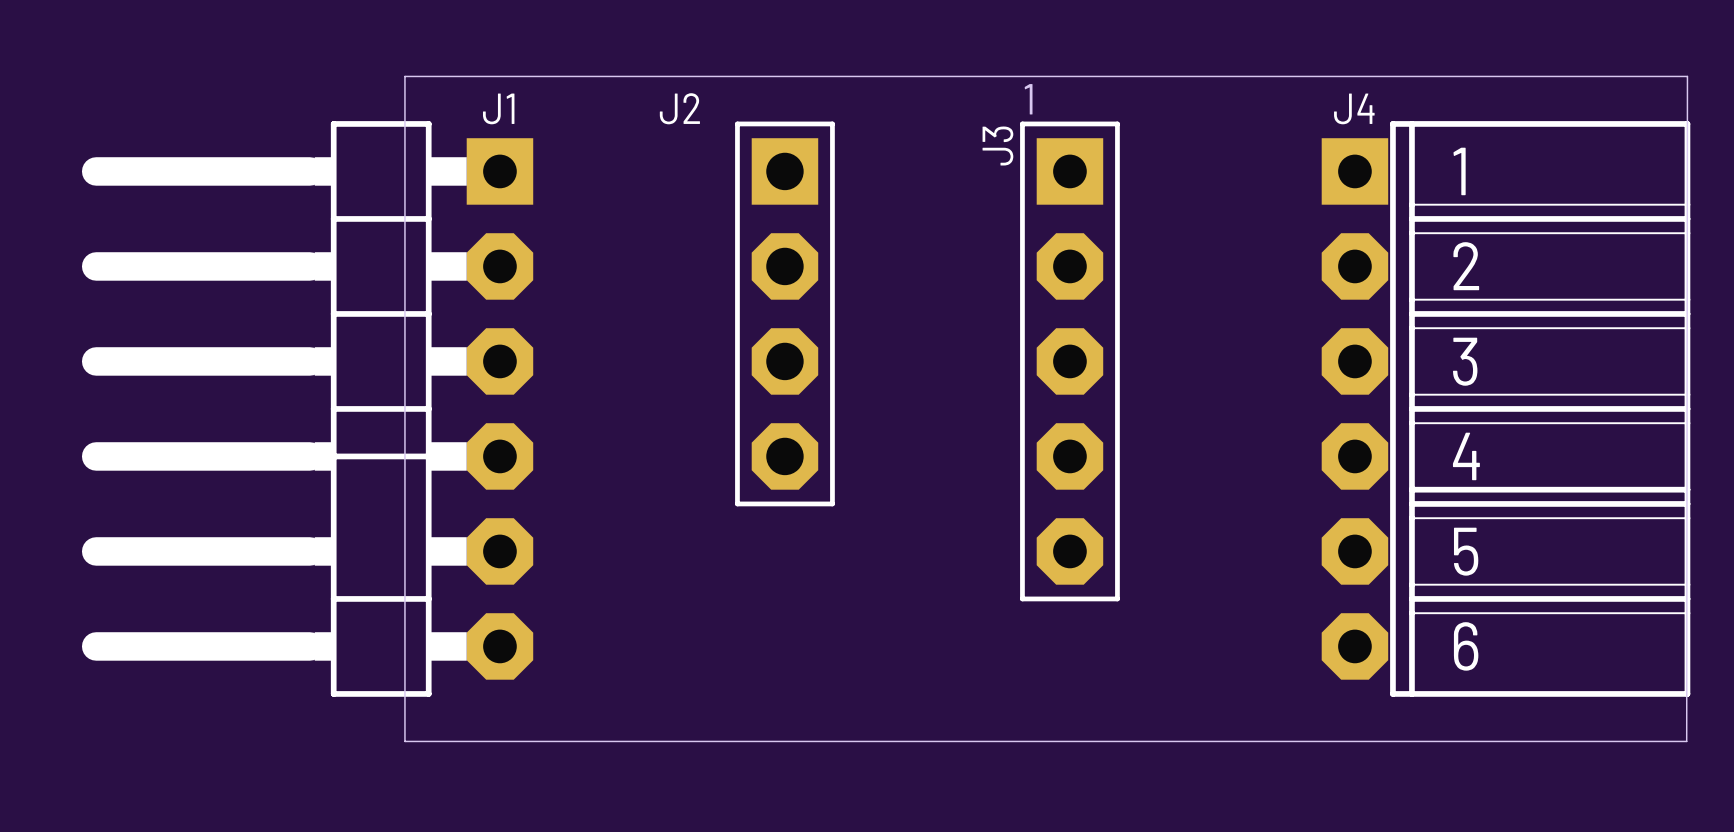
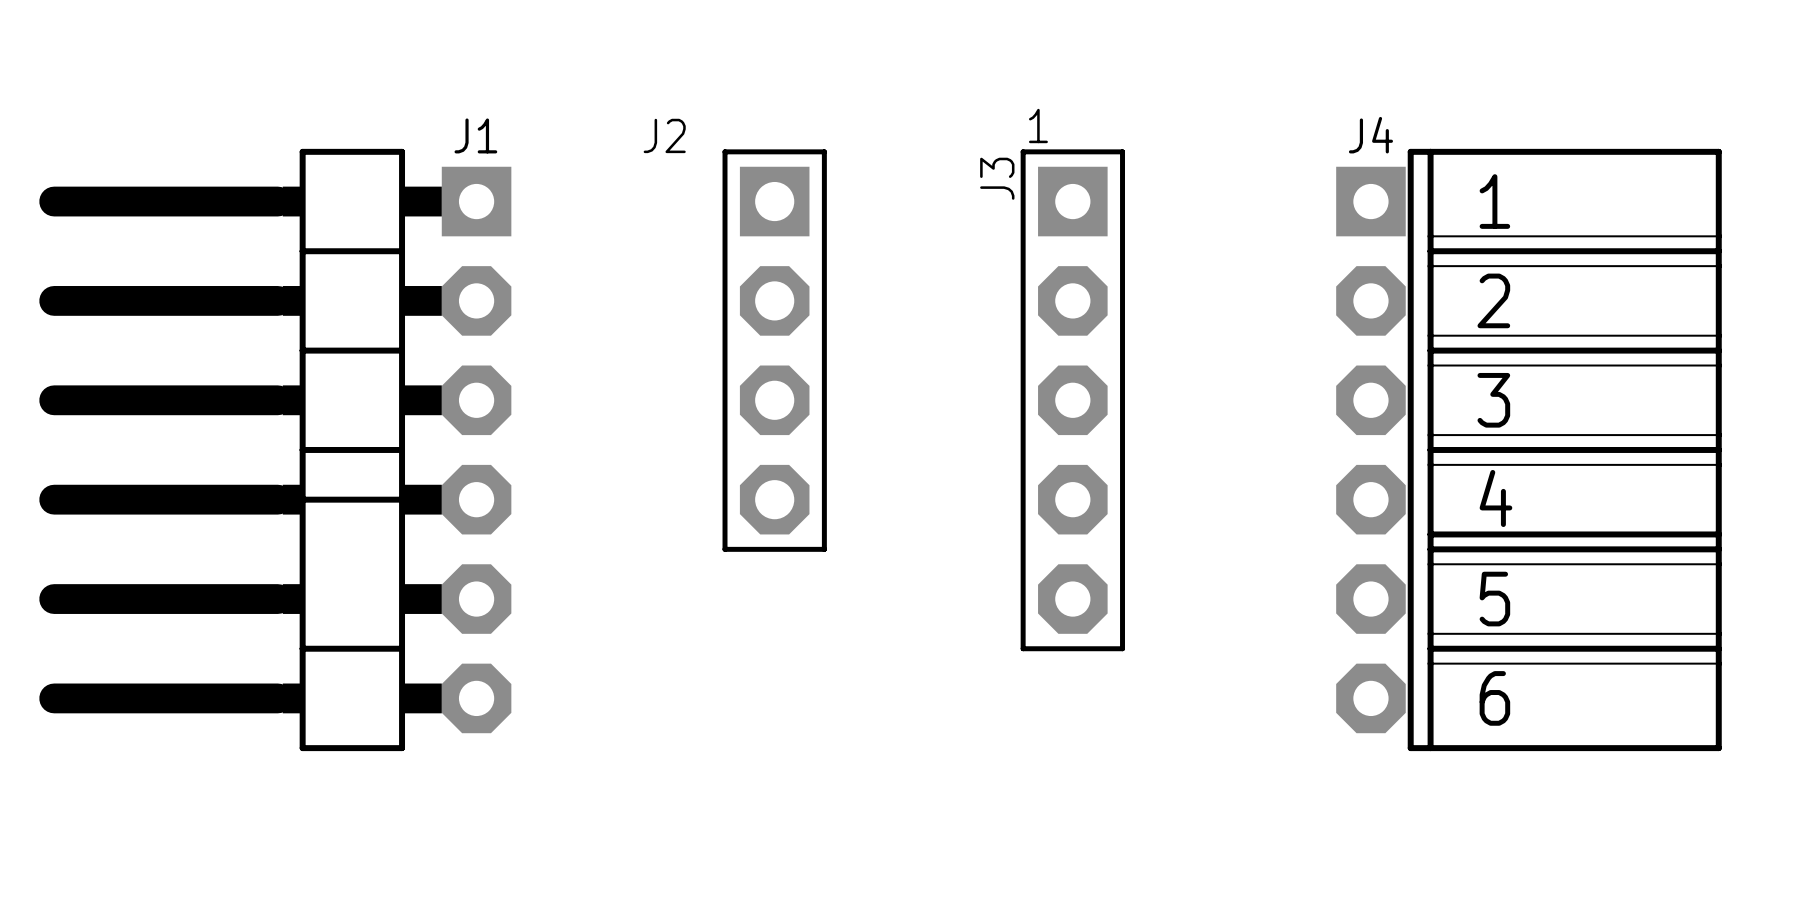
board edge: (404, 76) (1687, 76) (1686, 741) (404, 741) (404, 76) -> none

